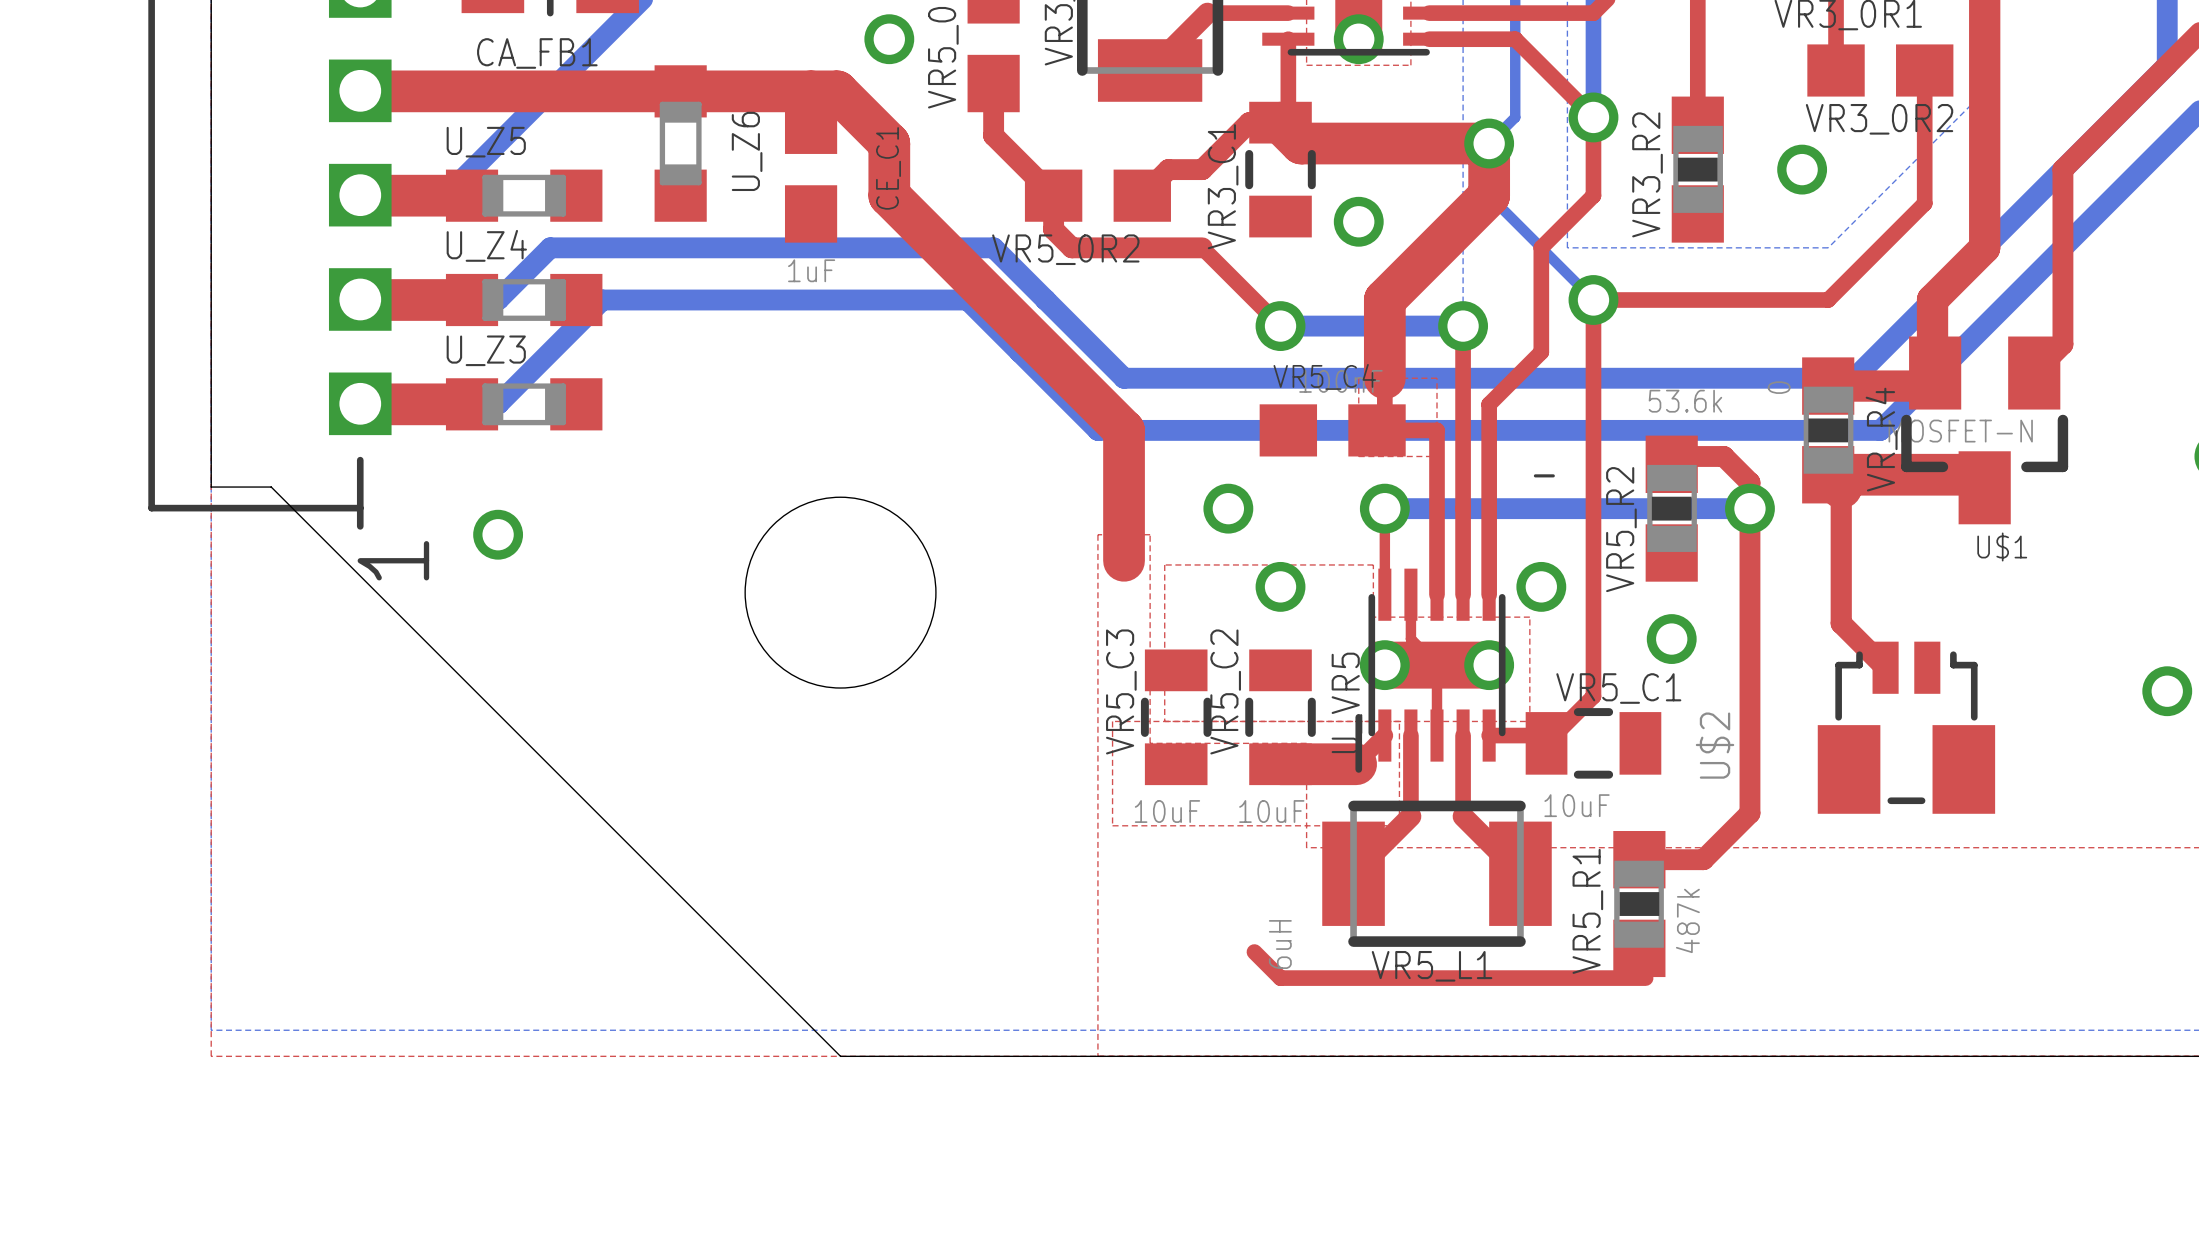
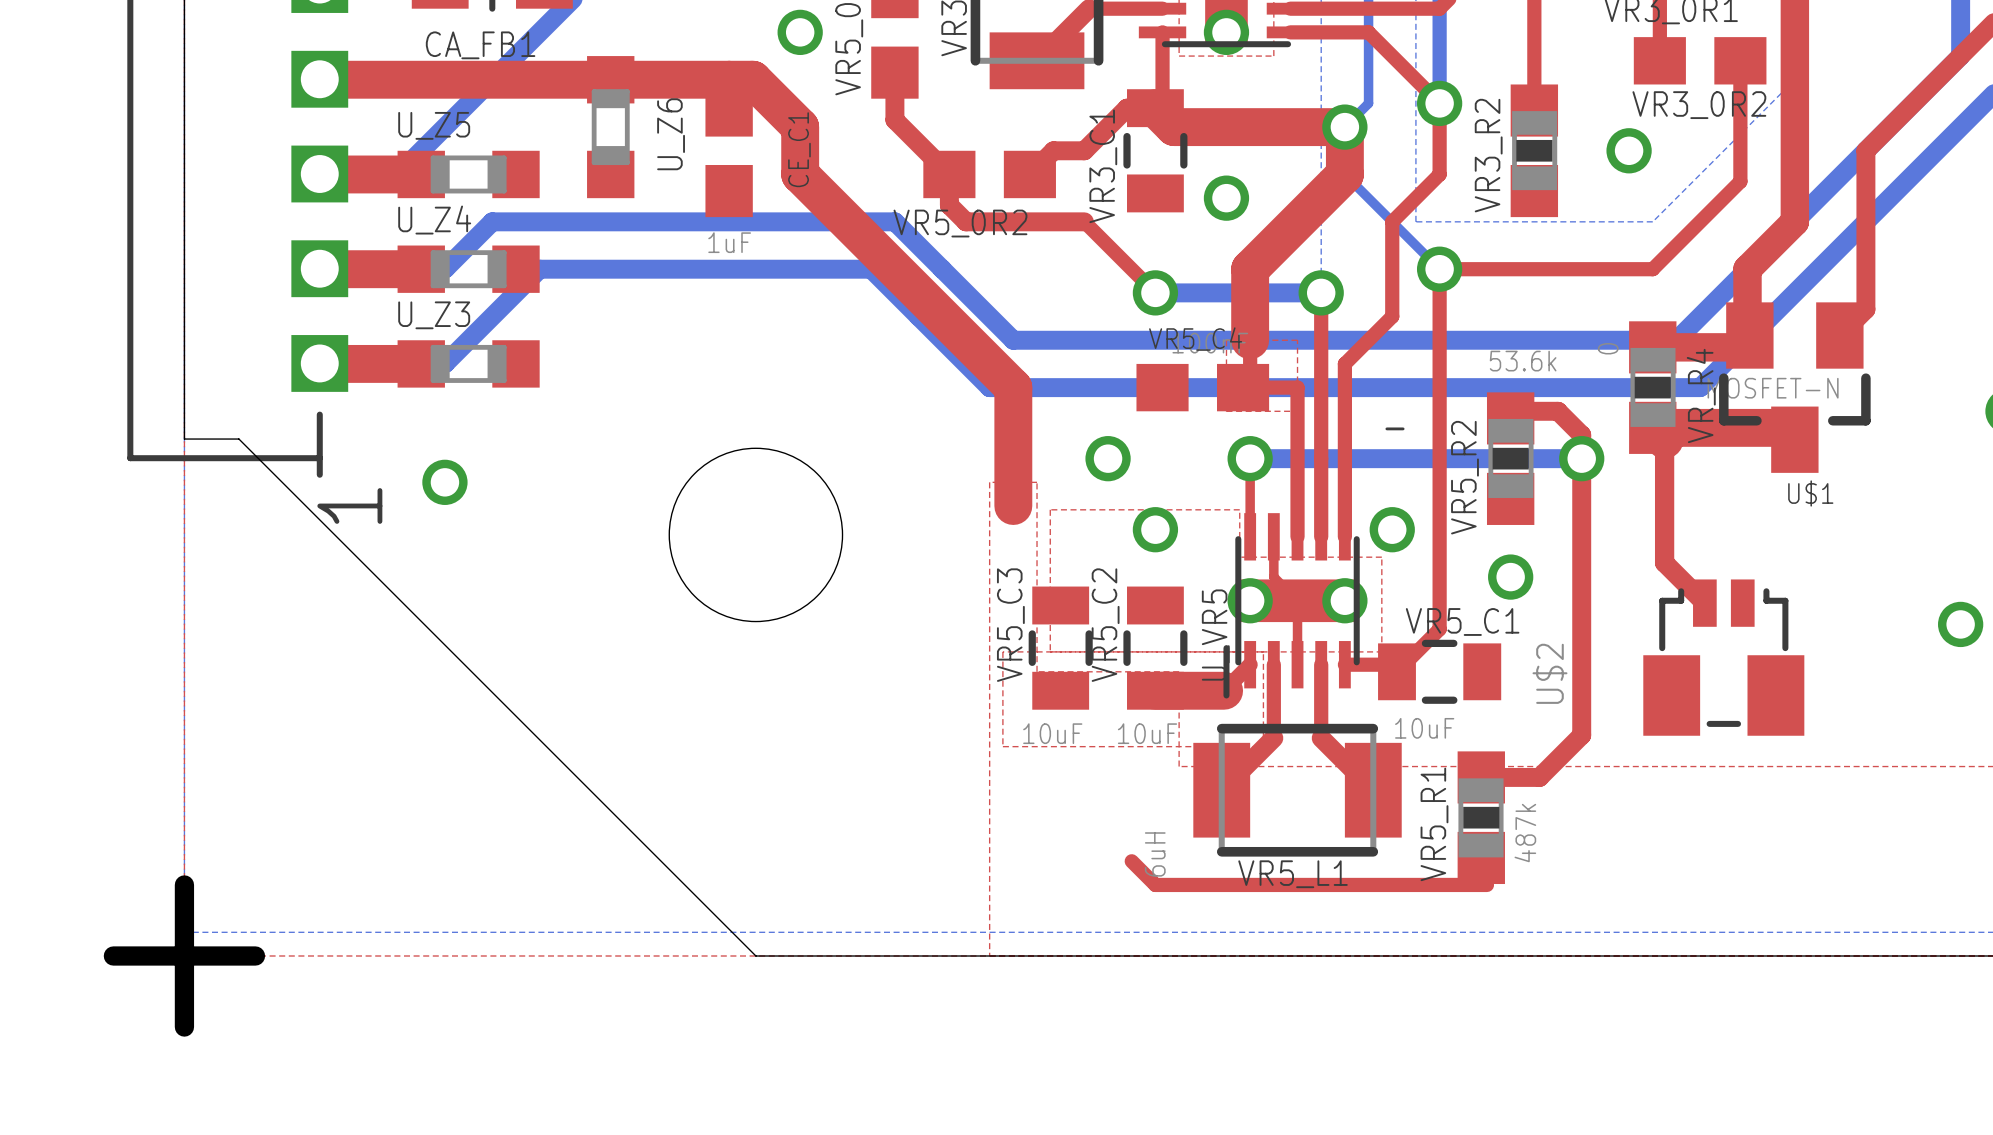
board edge: none -> (184, 884) (184, 1027)
board edge: none -> (113, 956) (255, 956)

